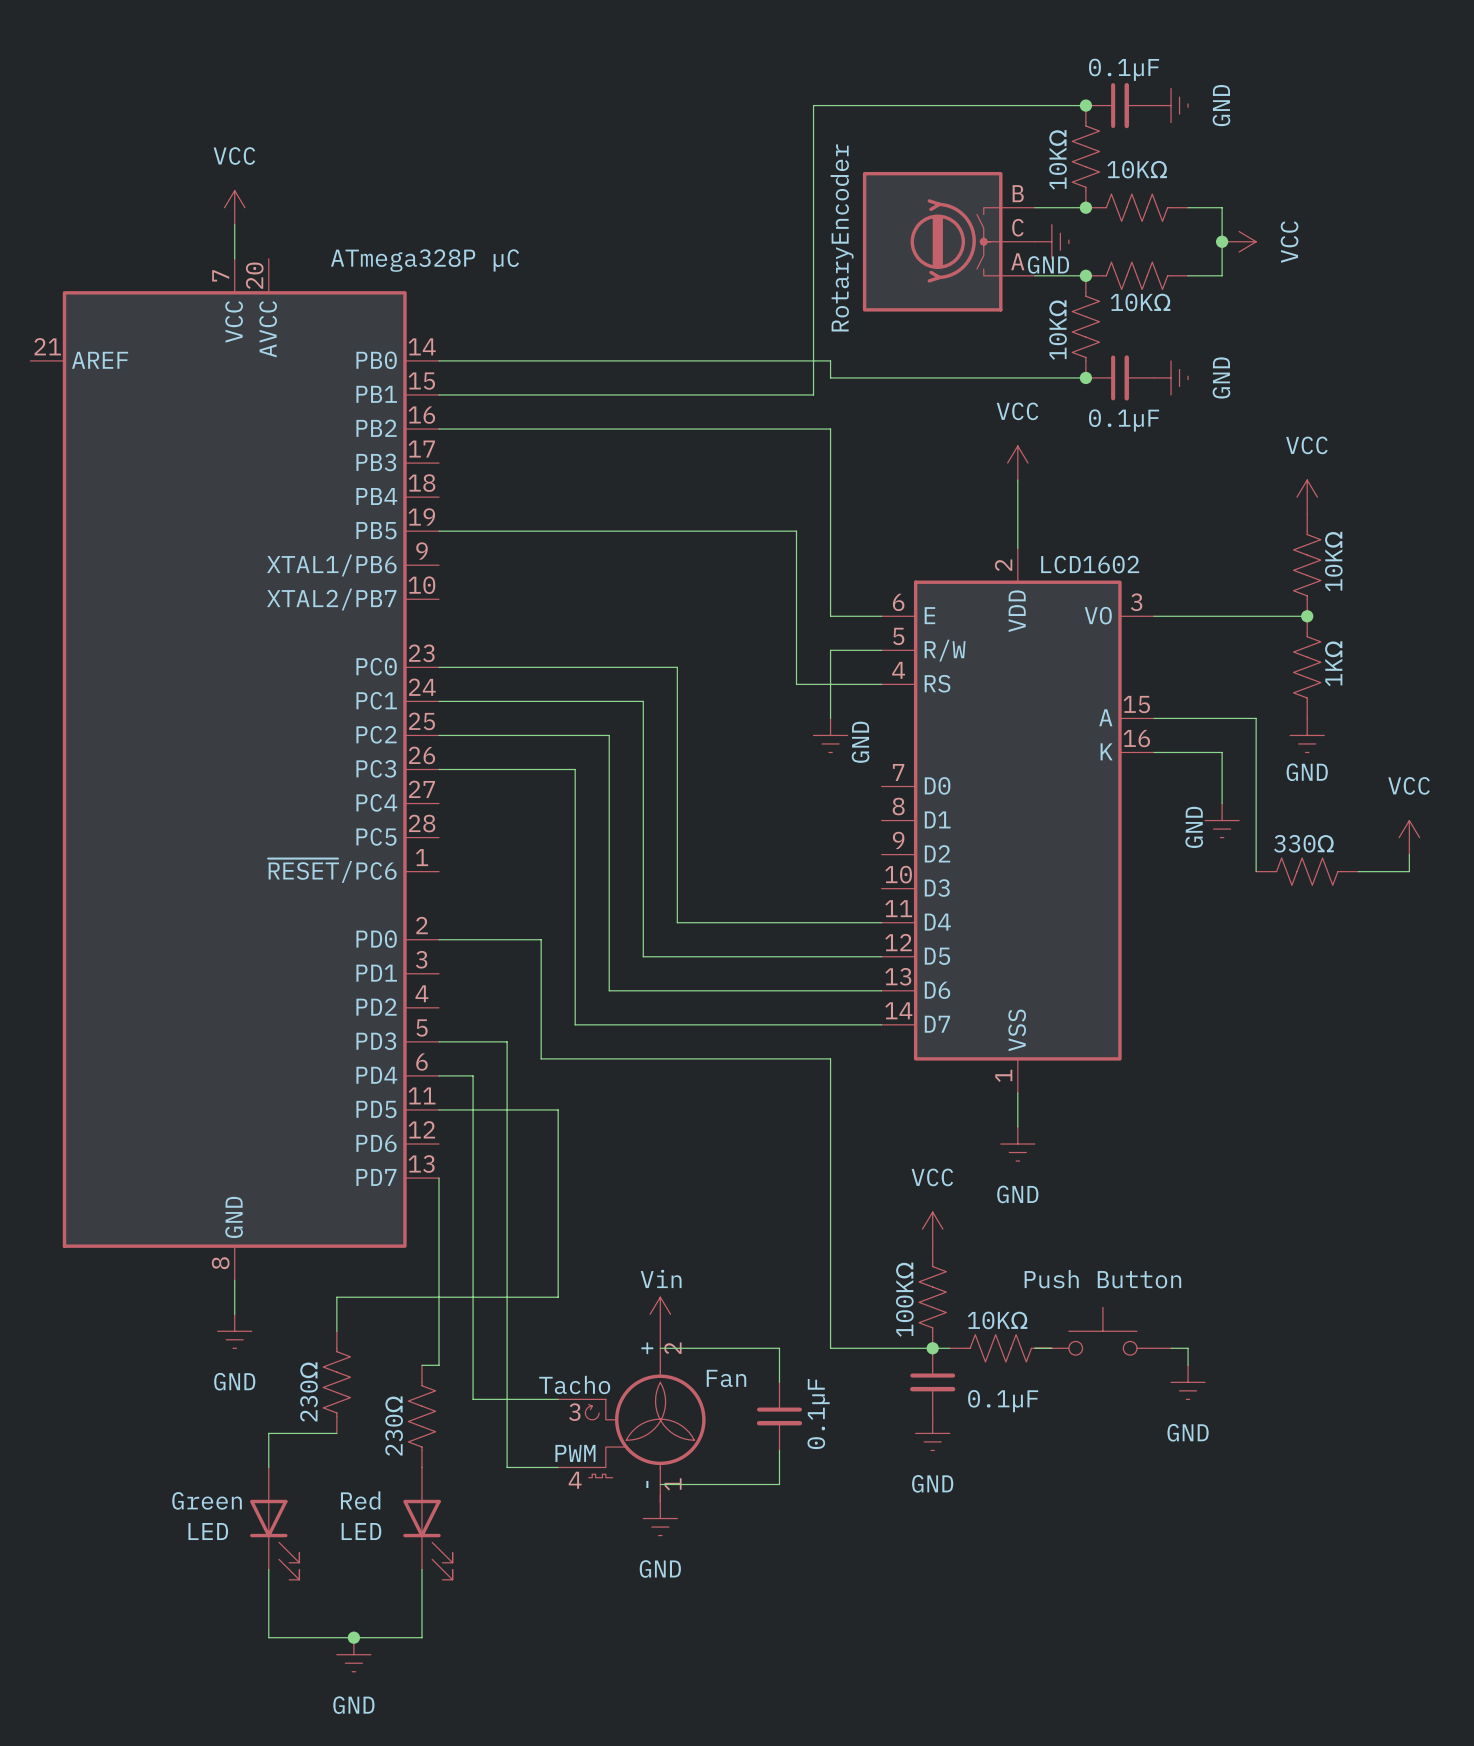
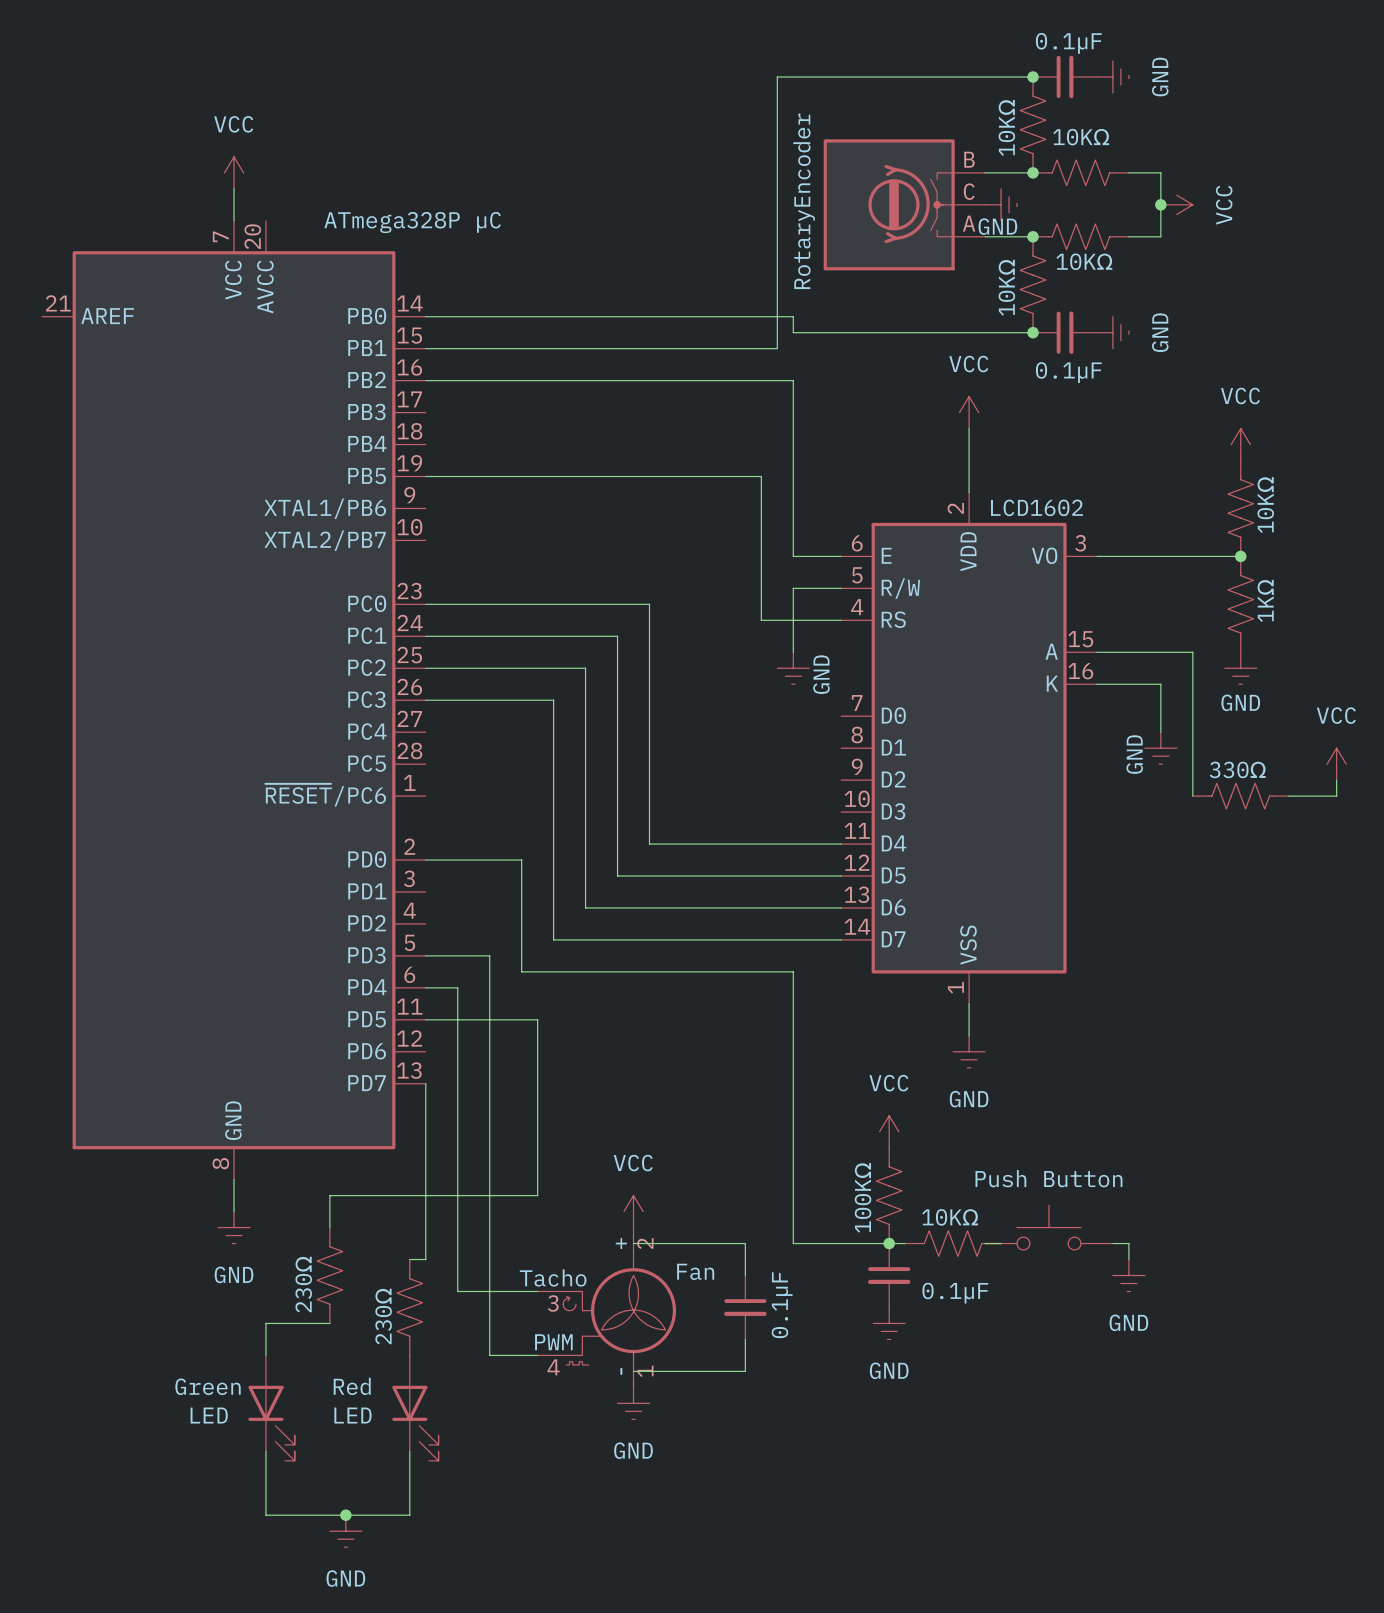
power symbol: Vin (660, 1314) -> VCC (633, 1211)

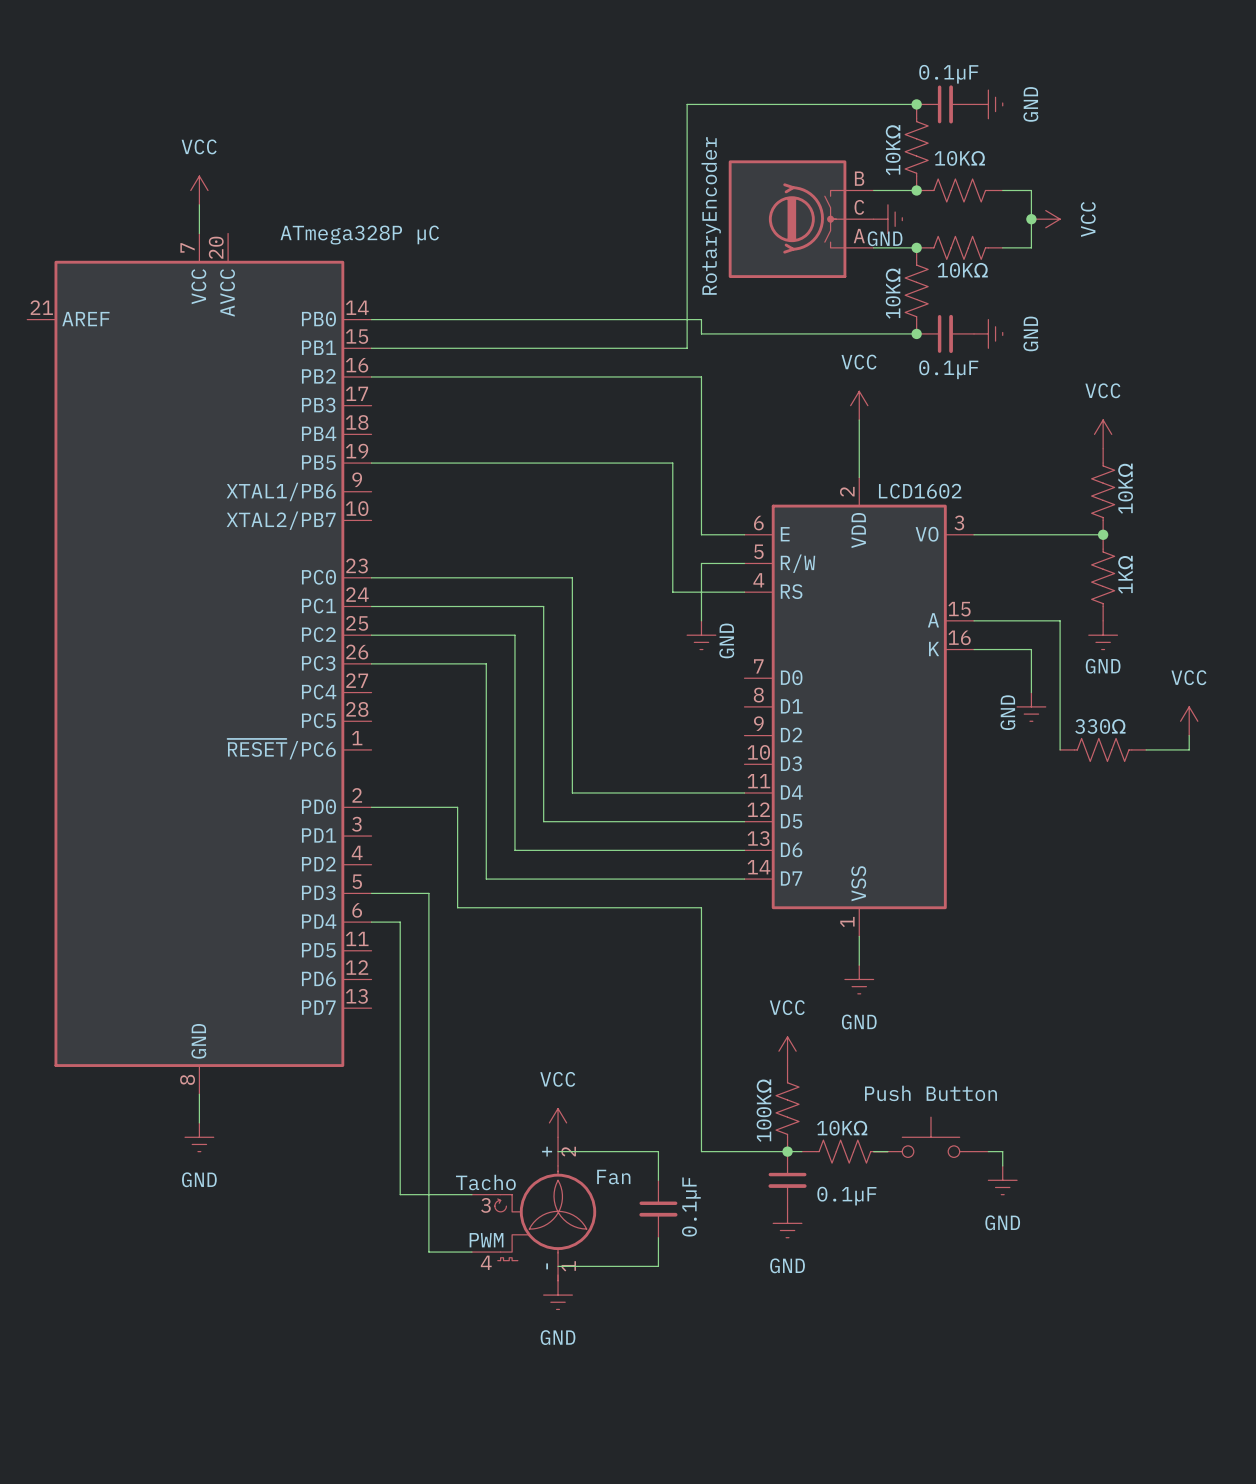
wire: (425, 1019) (537, 1019) (537, 1195) (329, 1195) (329, 1227) -> none
wire: (425, 1083) (425, 1259) (409, 1259) -> none
part: 230Ω (329, 1275) -> none
part: 230Ω (409, 1307) -> none
wire: (329, 1323) (265, 1323) (265, 1355) -> none
Green: LED (271, 1408) -> none
Red: LED (415, 1408) -> none
wire: (265, 1451) (265, 1515) (409, 1515) (409, 1451) -> none
junction: (345, 1515) -> none
power symbol: GND (345, 1531) -> none

